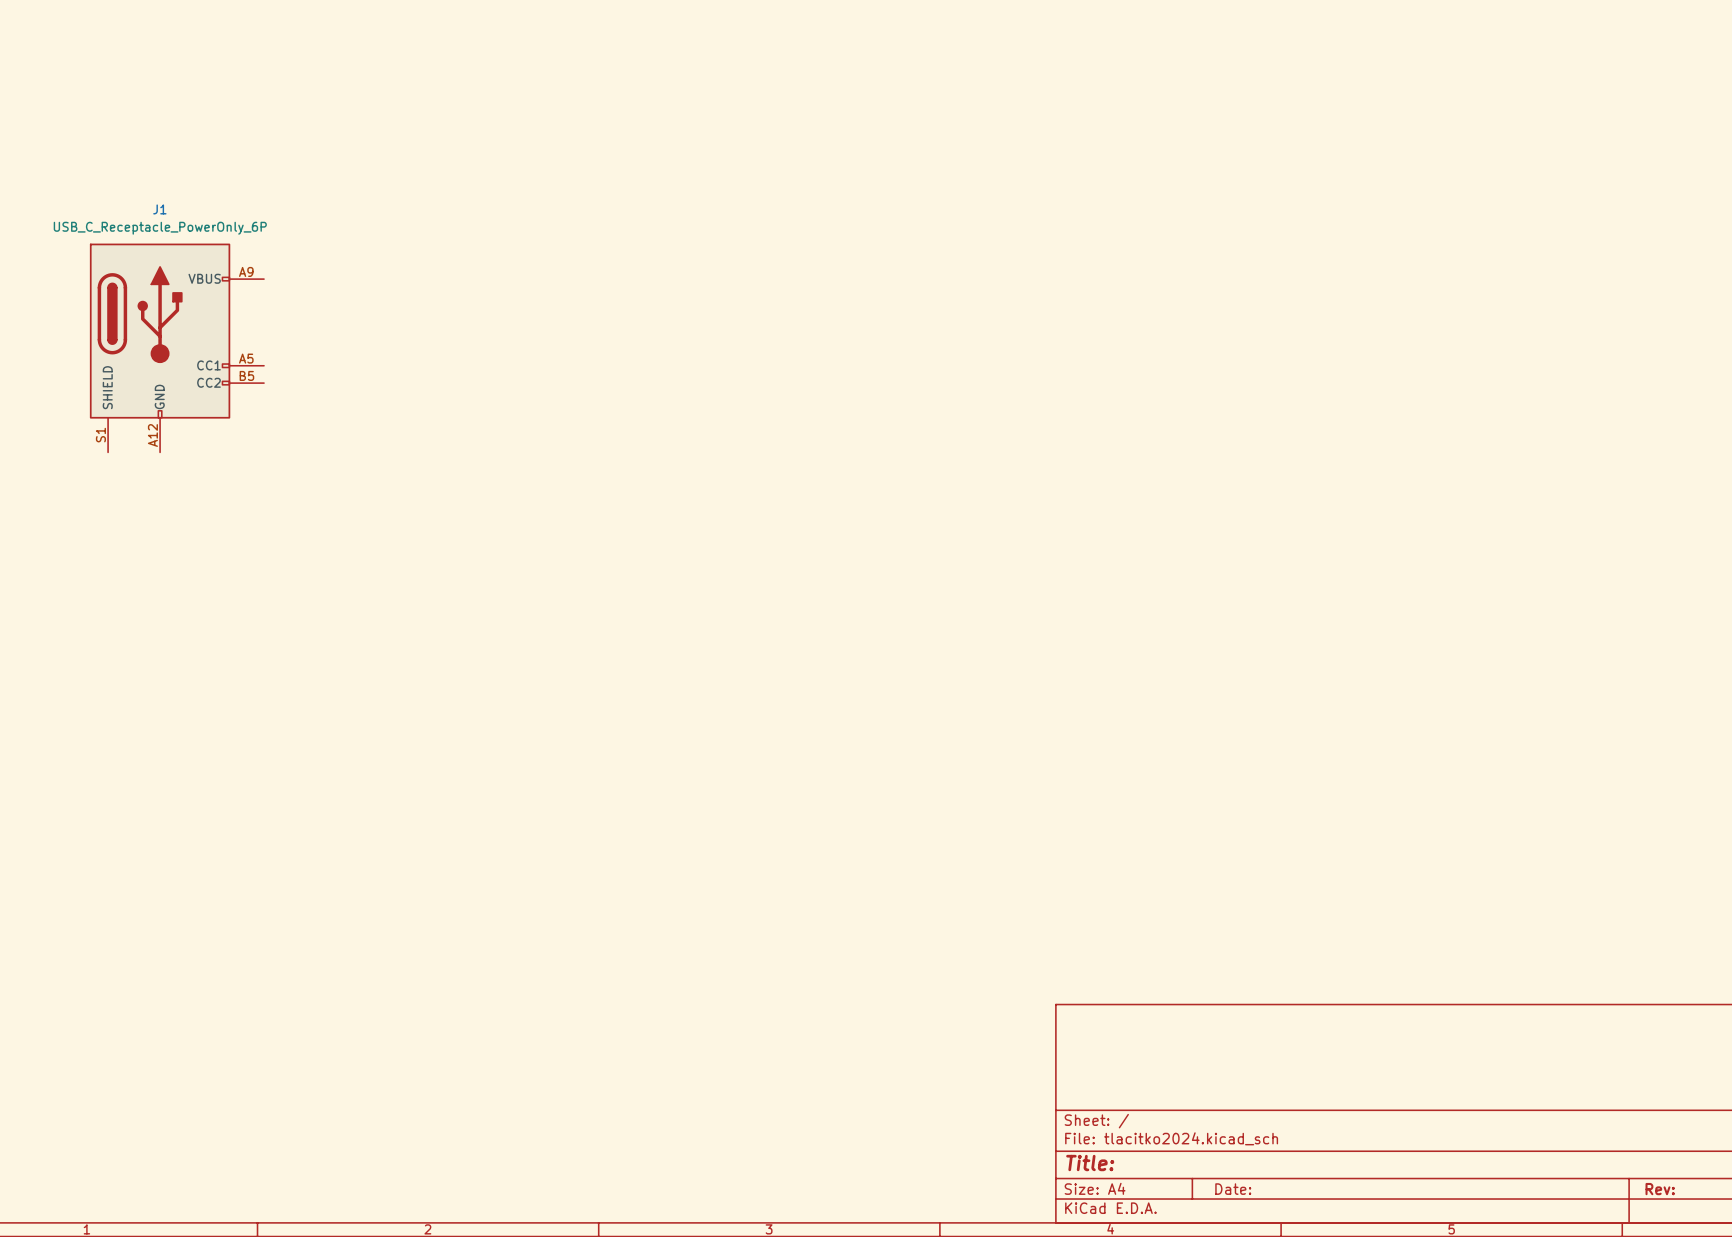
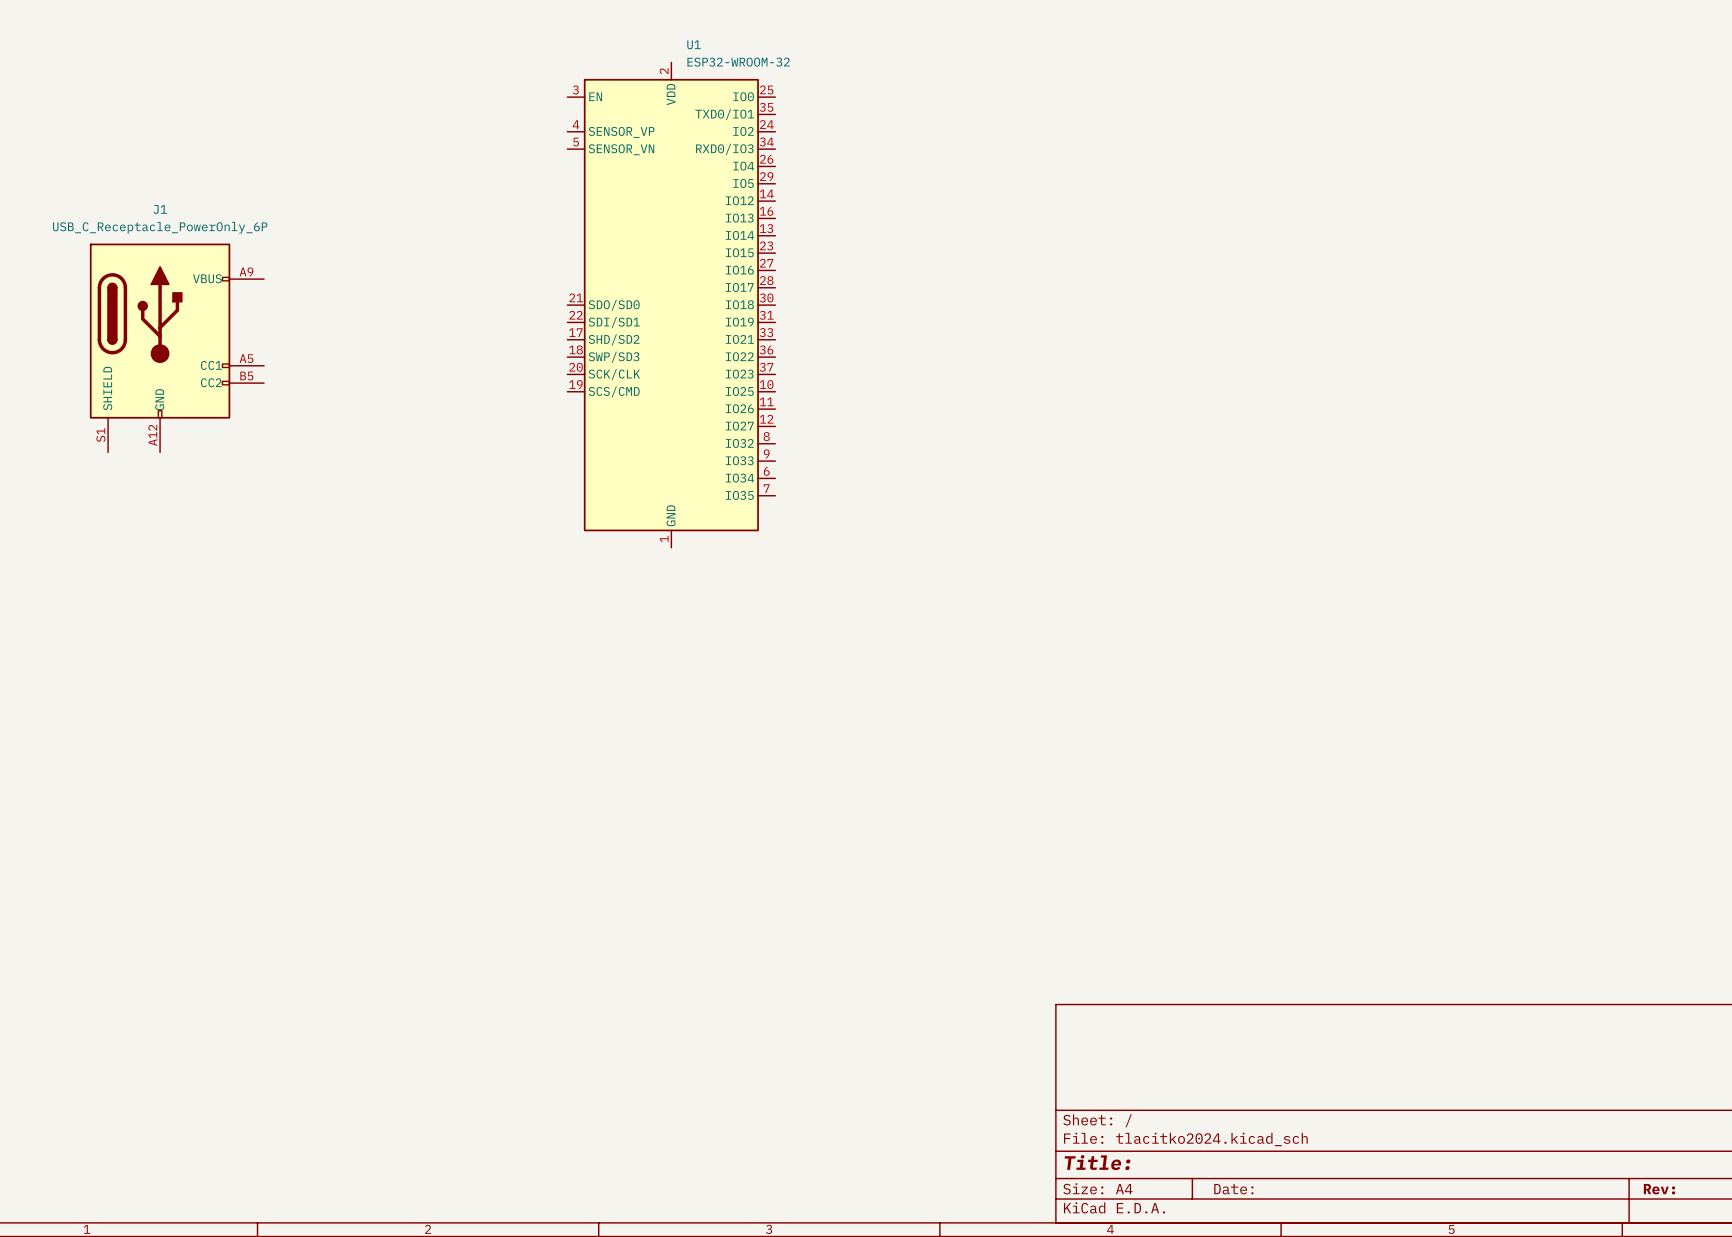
U1: none -> ESP32-WROOM-32 (671, 305)

